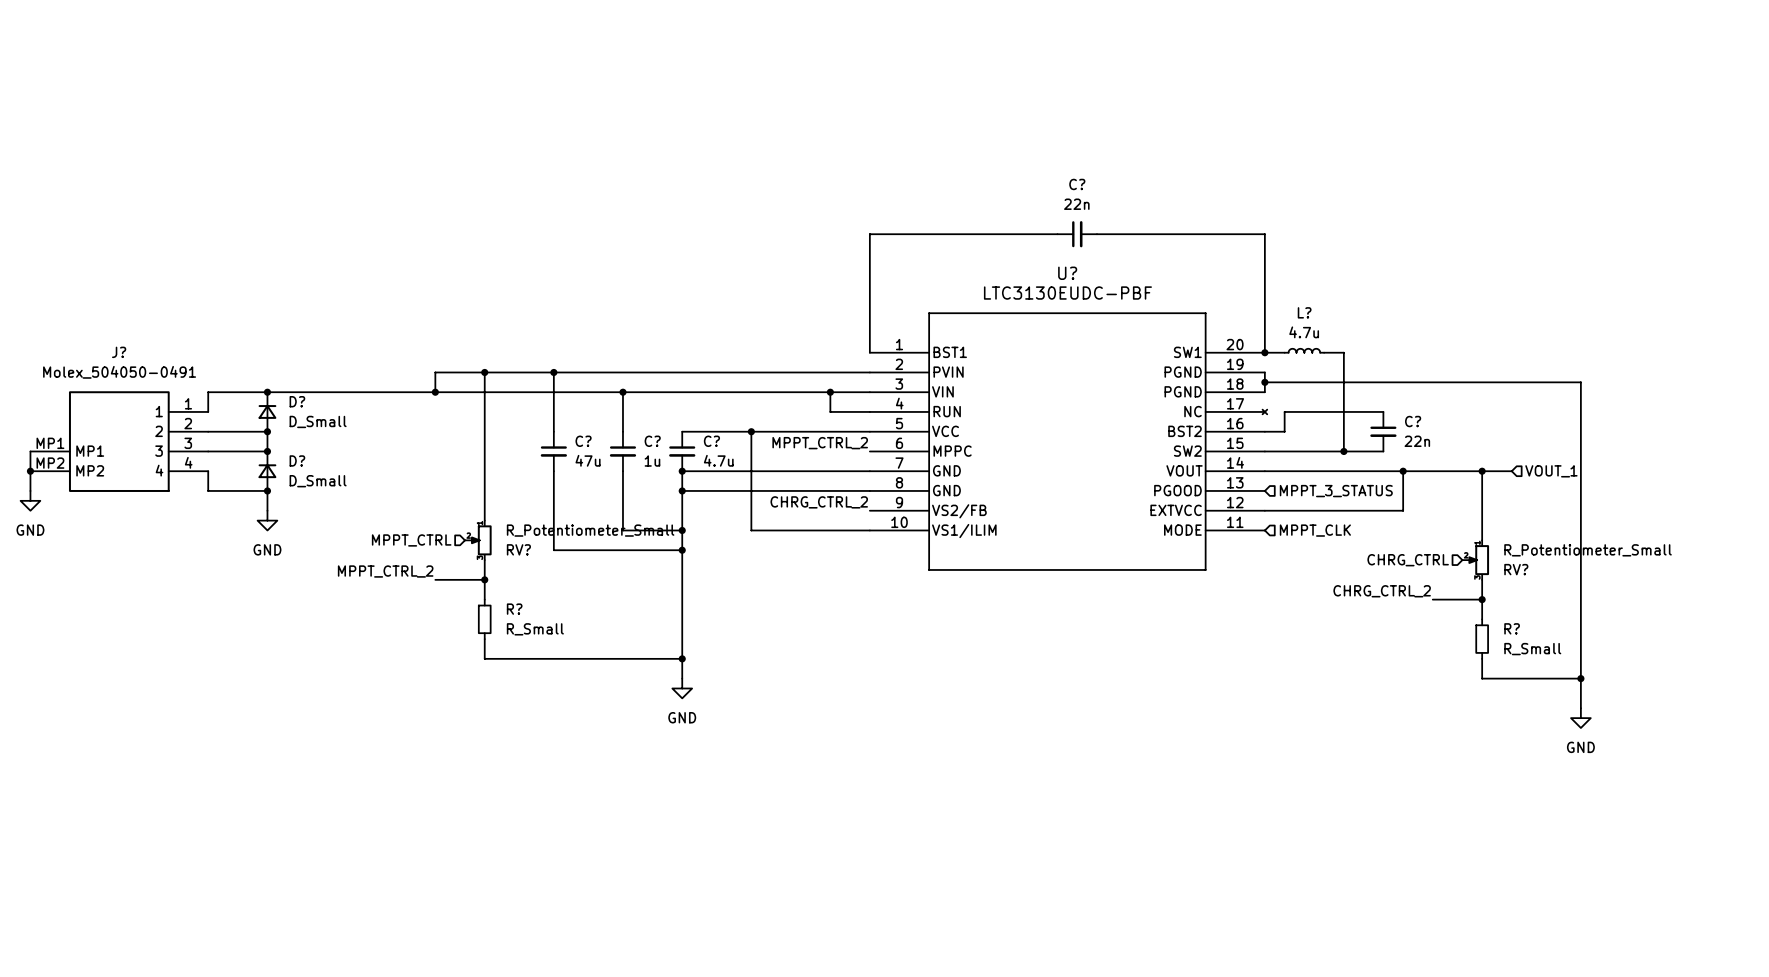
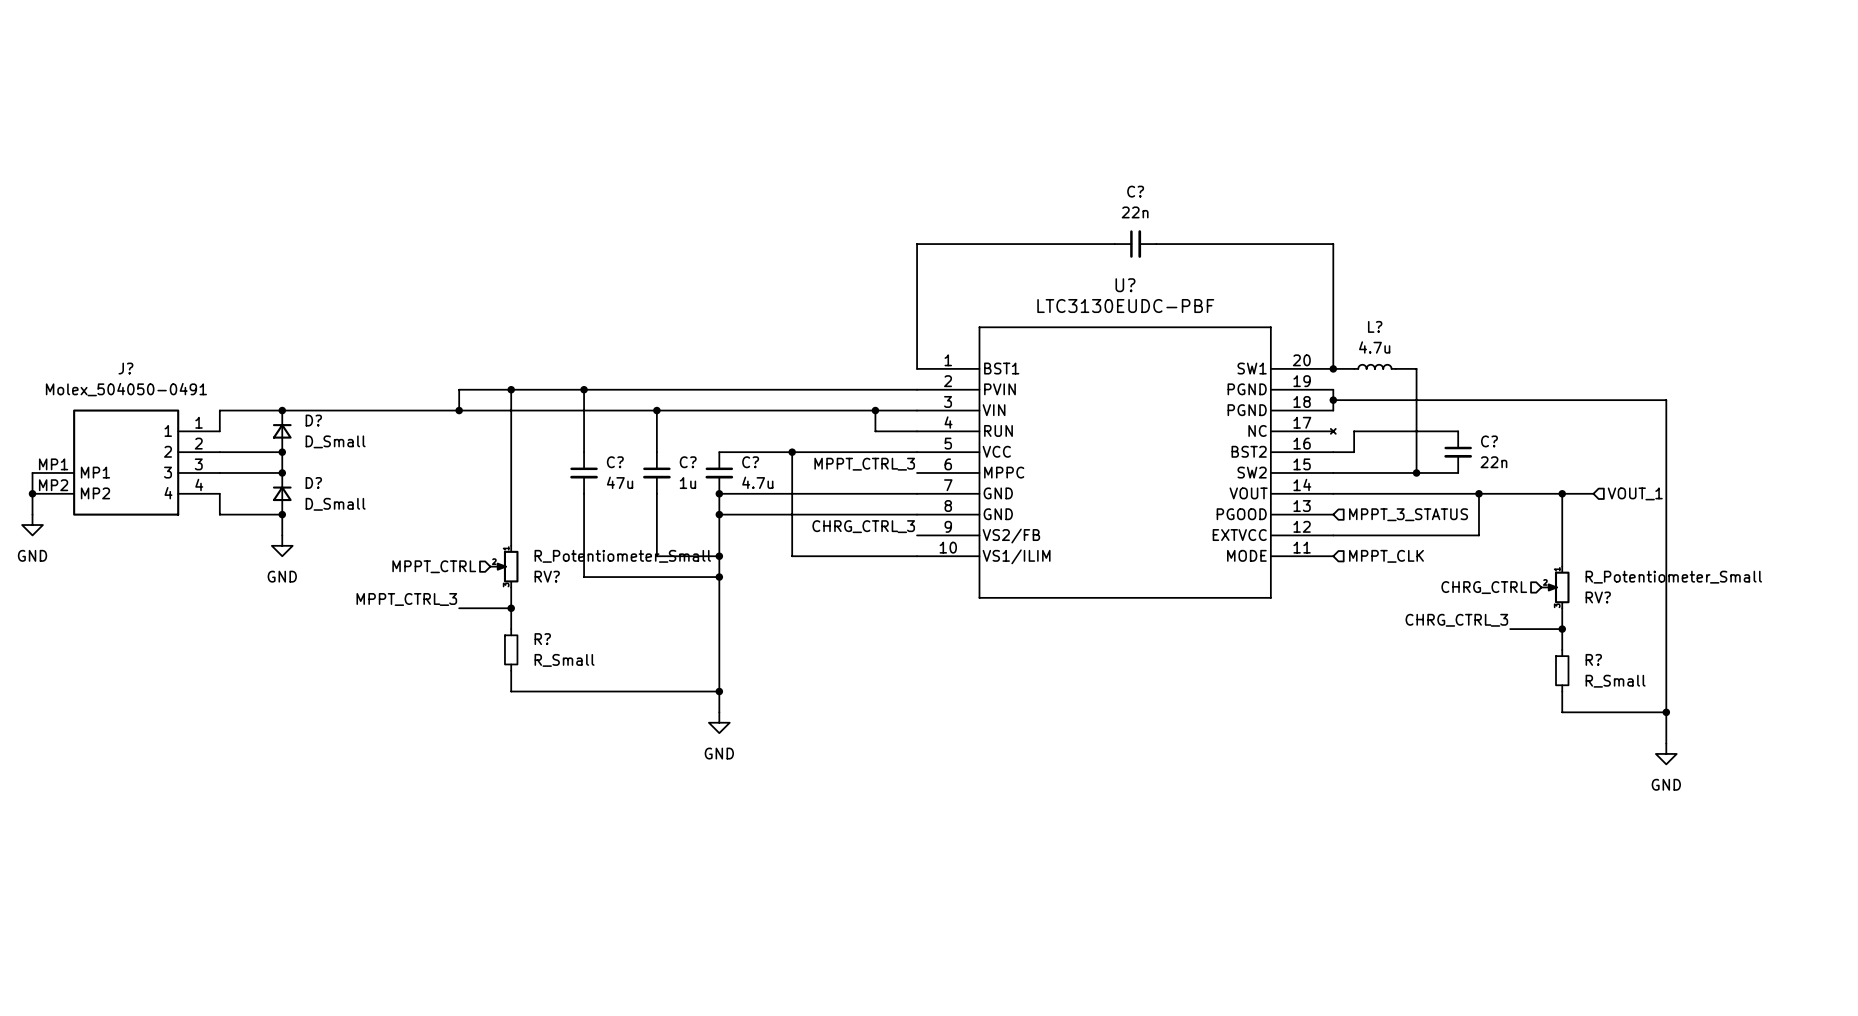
label: MPPT_CTRL_2 (820, 443) -> MPPT_CTRL_3 (864, 464)
label: CHRG_CTRL_2 (819, 502) -> CHRG_CTRL_3 (863, 526)
label: MPPT_CTRL_2 (385, 571) -> MPPT_CTRL_3 (406, 599)
label: CHRG_CTRL_2 (1382, 591) -> CHRG_CTRL_3 (1456, 620)

